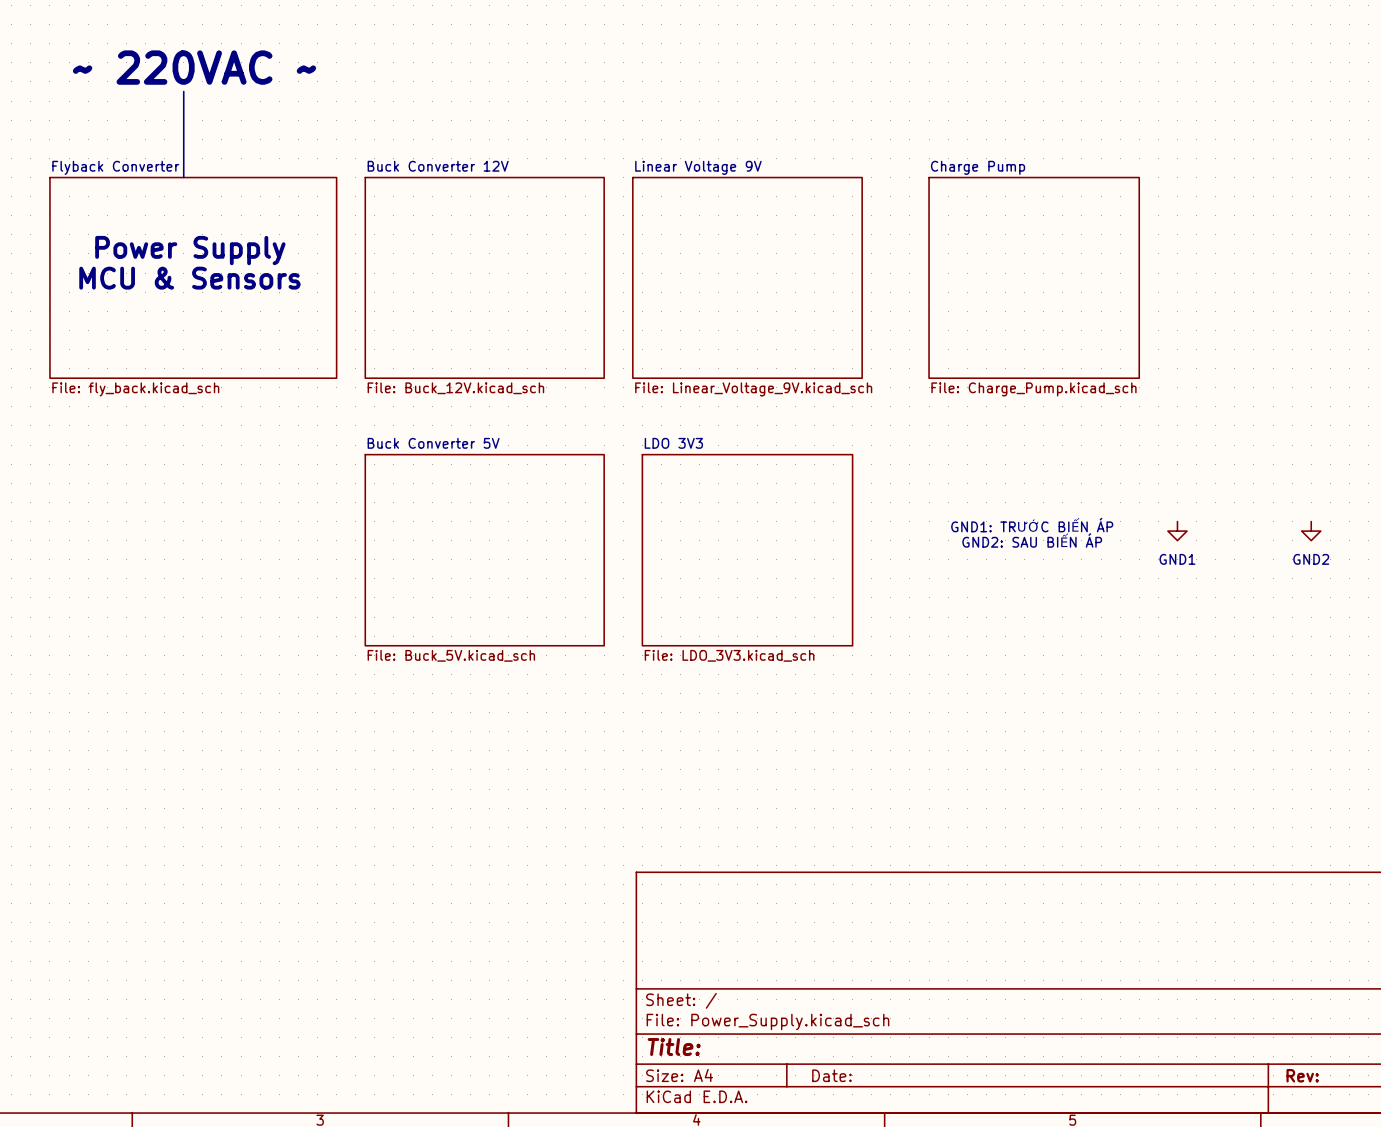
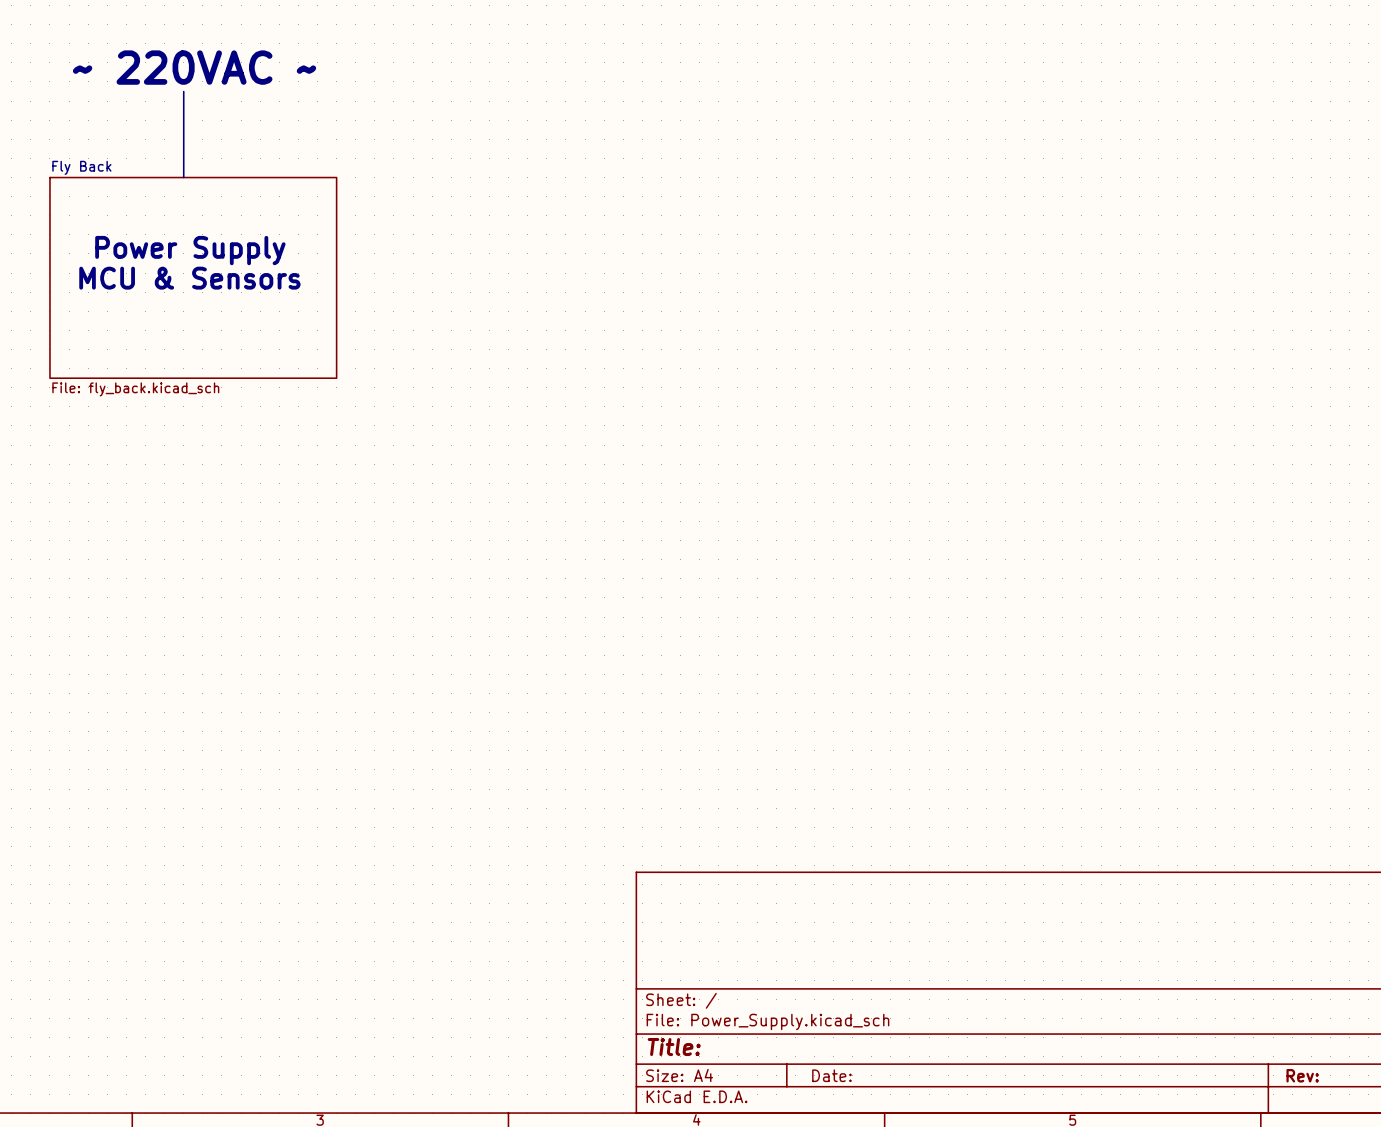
sheet Flyback Converter name: Flyback Converter (115, 167) -> Fly Back (81, 167)
sheet Buck Converter 12V: File: Buck_12V.kicad_sch (484, 277) -> none
sheet Linear Voltage 9V: File: Linear_Voltage_9V.kicad_sch (747, 277) -> none
sheet Charge Pump: File: Charge_Pump.kicad_sch (1034, 277) -> none
text: GND1: TRƯỚC BIẾN ÁP (1032, 525) -> none
power symbol: GND1 (1177, 531) -> none
power symbol: GND2 (1311, 531) -> none
text: GND2: SAU BIẾN ÁP (1032, 540) -> none
sheet Buck Converter 5V: File: Buck_5V.kicad_sch (484, 550) -> none
sheet LDO 3V3: File: LDO_3V3.kicad_sch (747, 550) -> none

